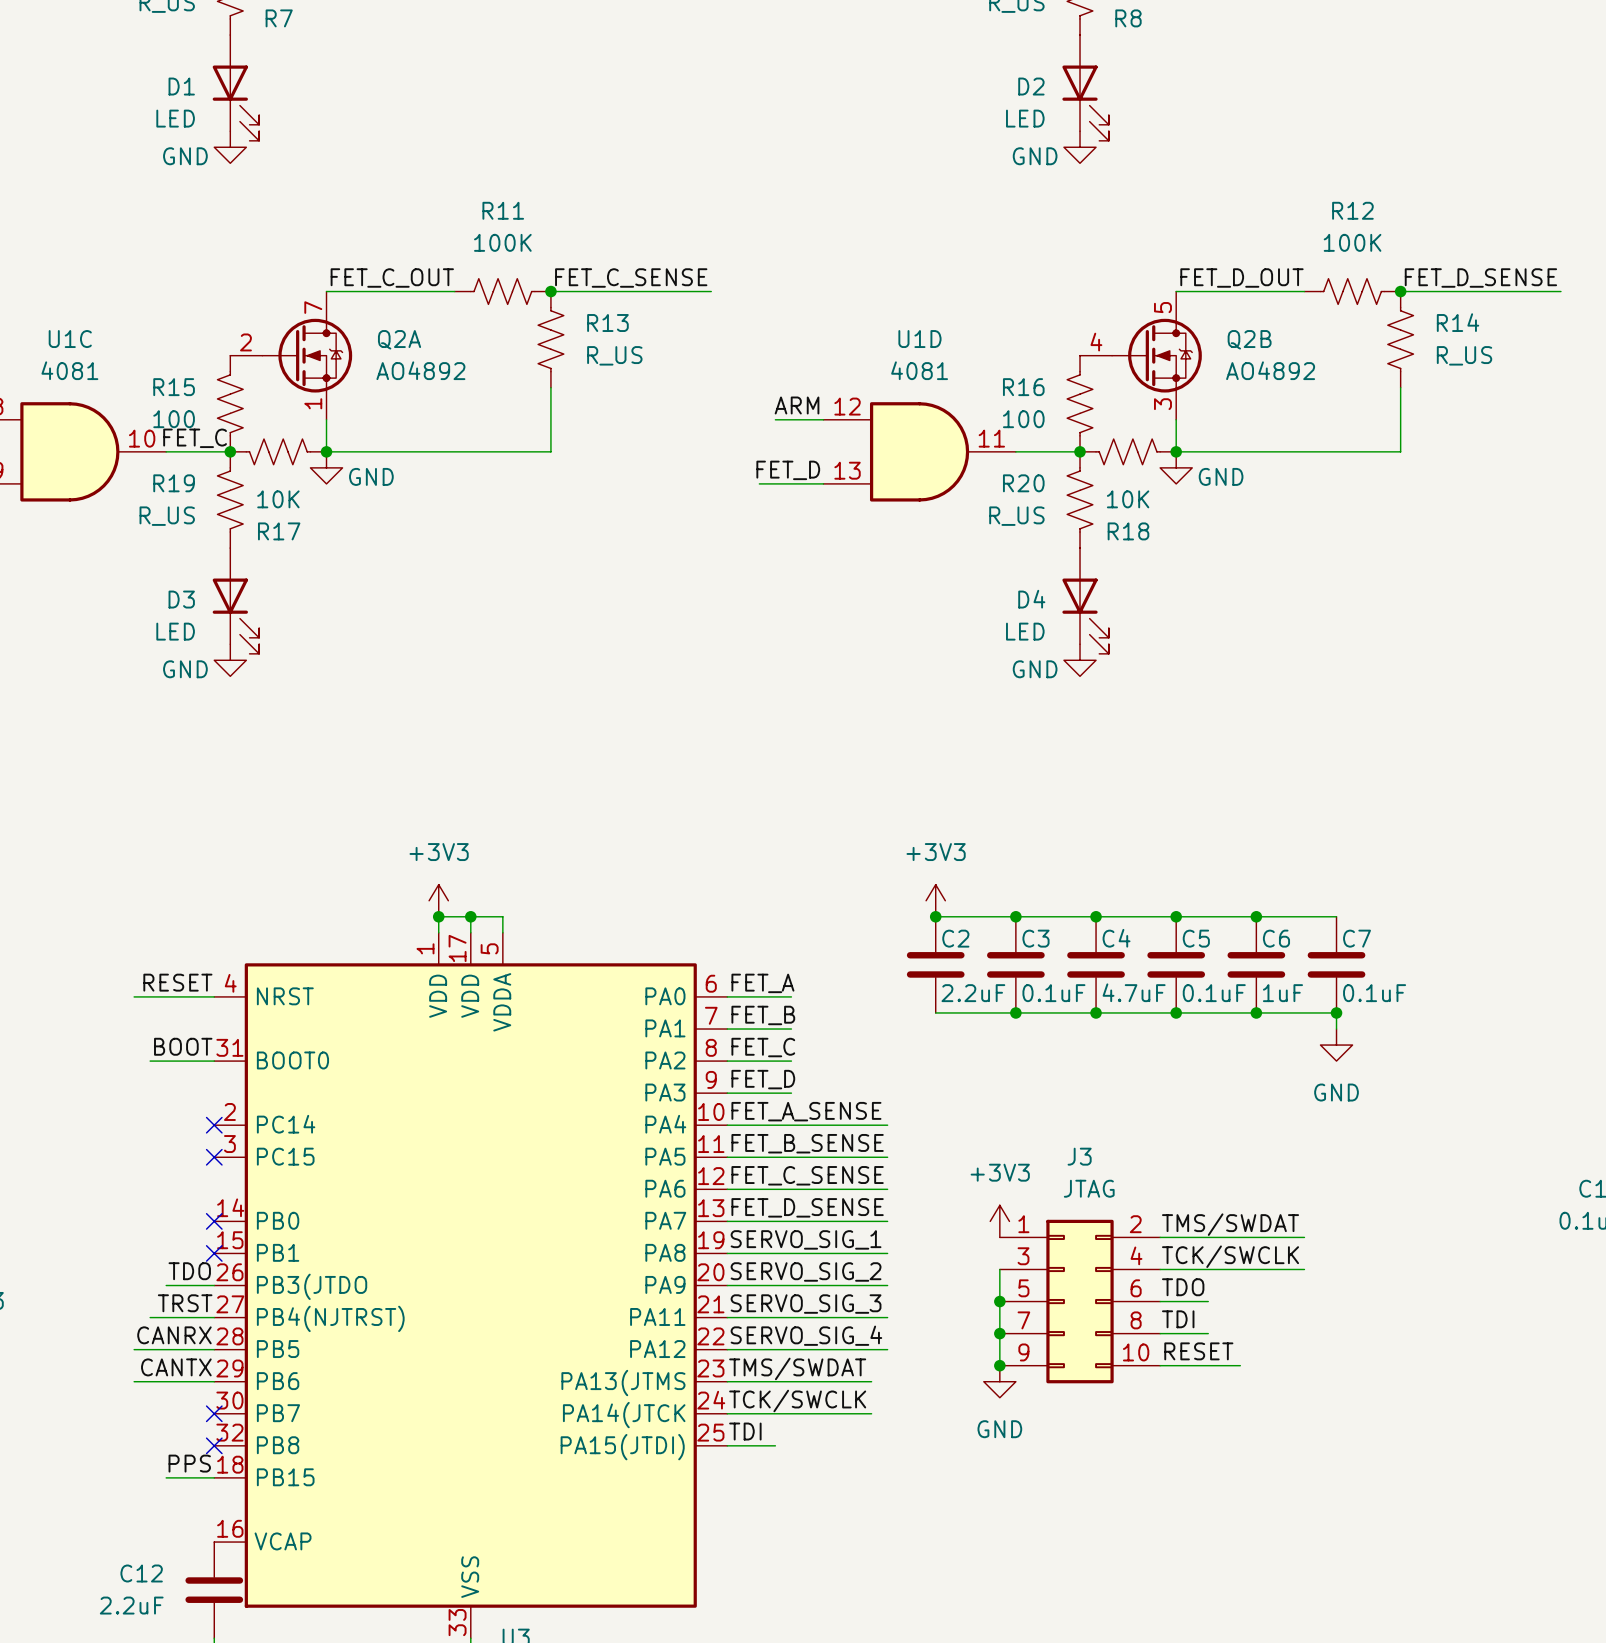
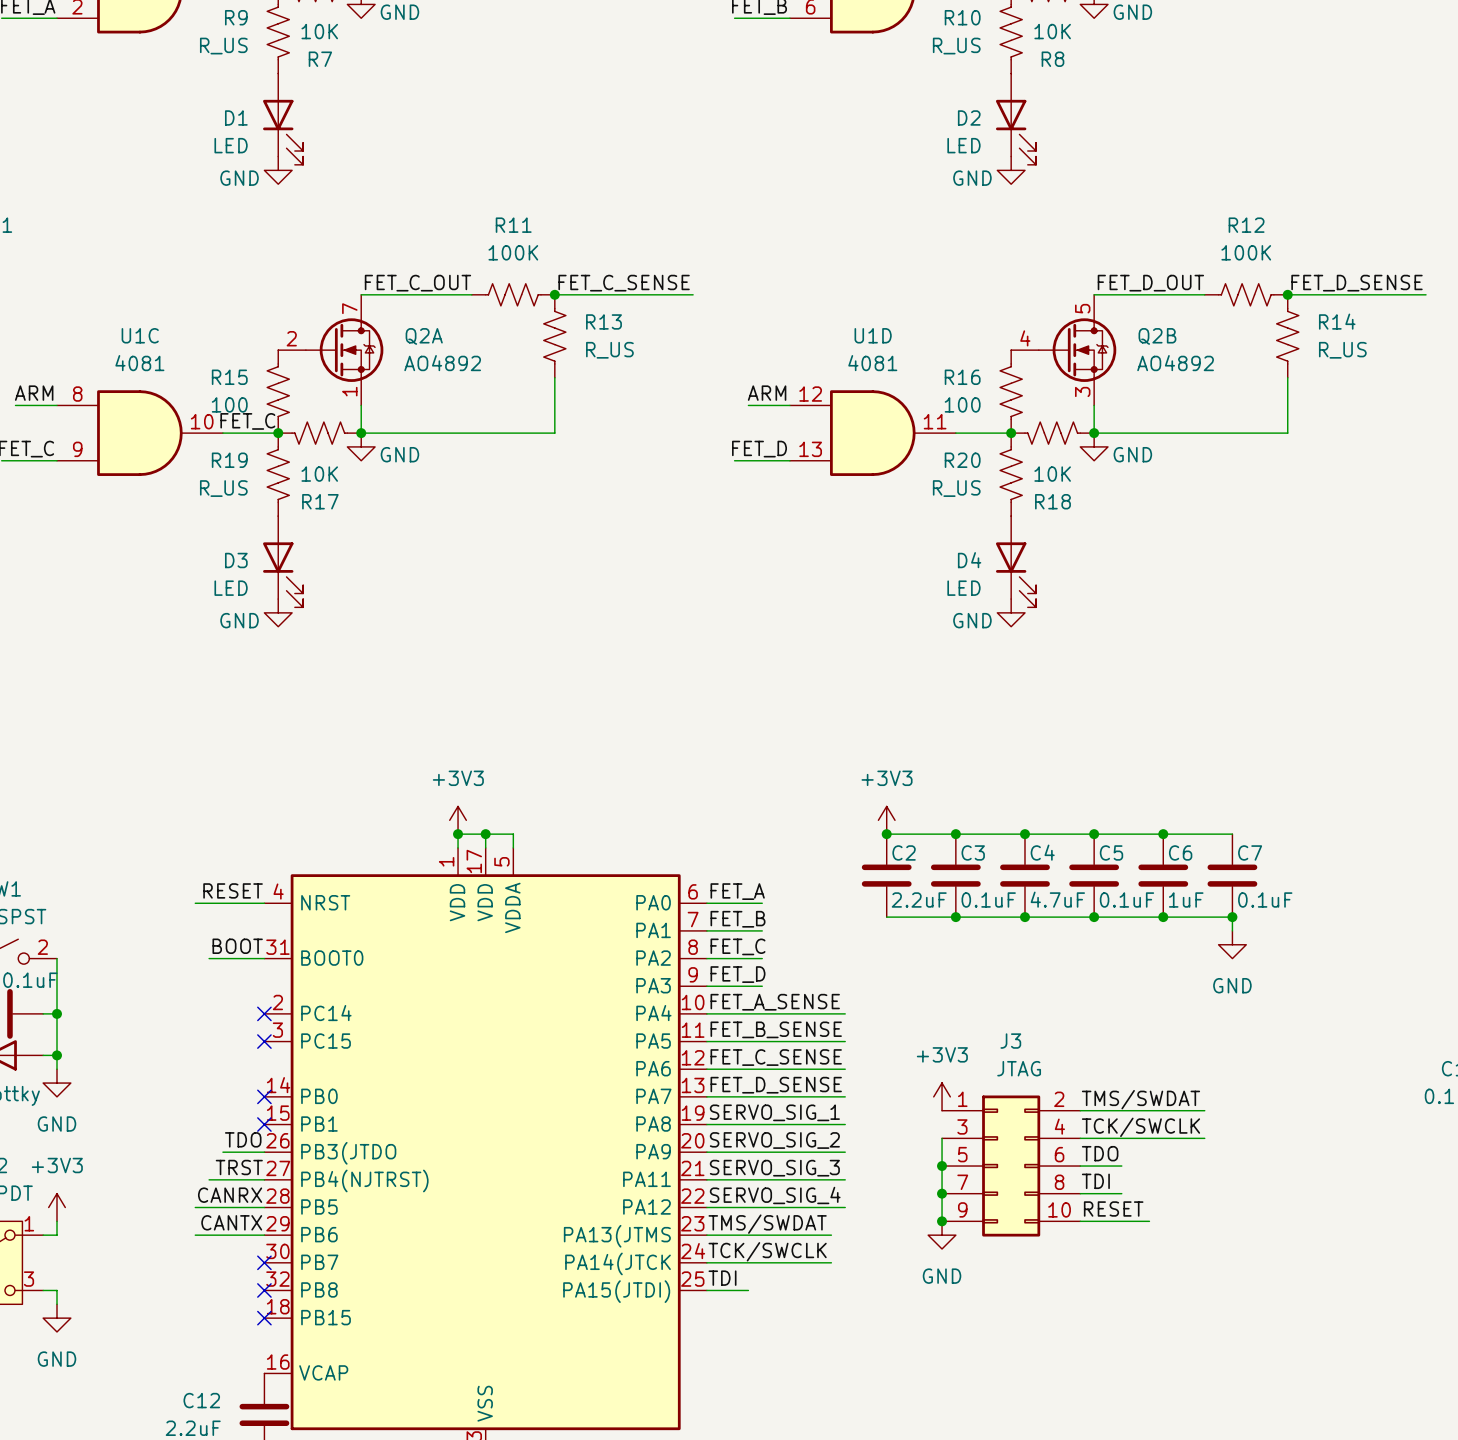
label: PPS (189, 1463) -> none
wire: (166, 1477) (214, 1477) -> none
no-connect mark: none -> (264, 1318)

